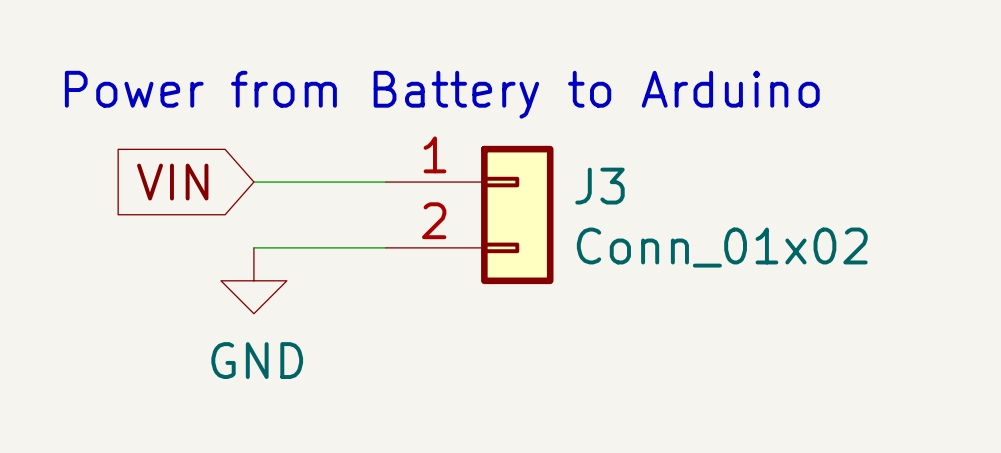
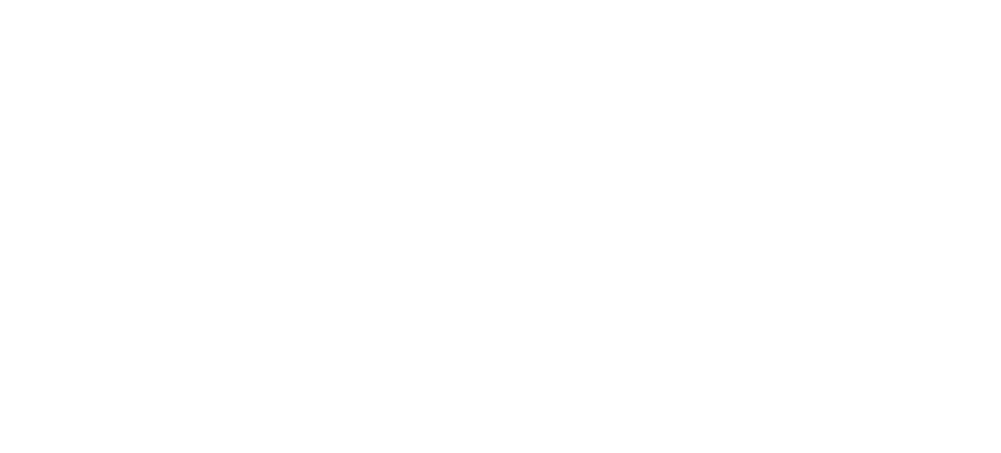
text: Power from Battery to Arduino (442, 94) -> none
global label: VIN (172, 182) -> none
wire: (253, 182) (385, 182) -> none
J3: Conn_01x02 (469, 214) -> none
wire: (253, 247) (385, 247) -> none
power symbol: GND (253, 280) -> none

